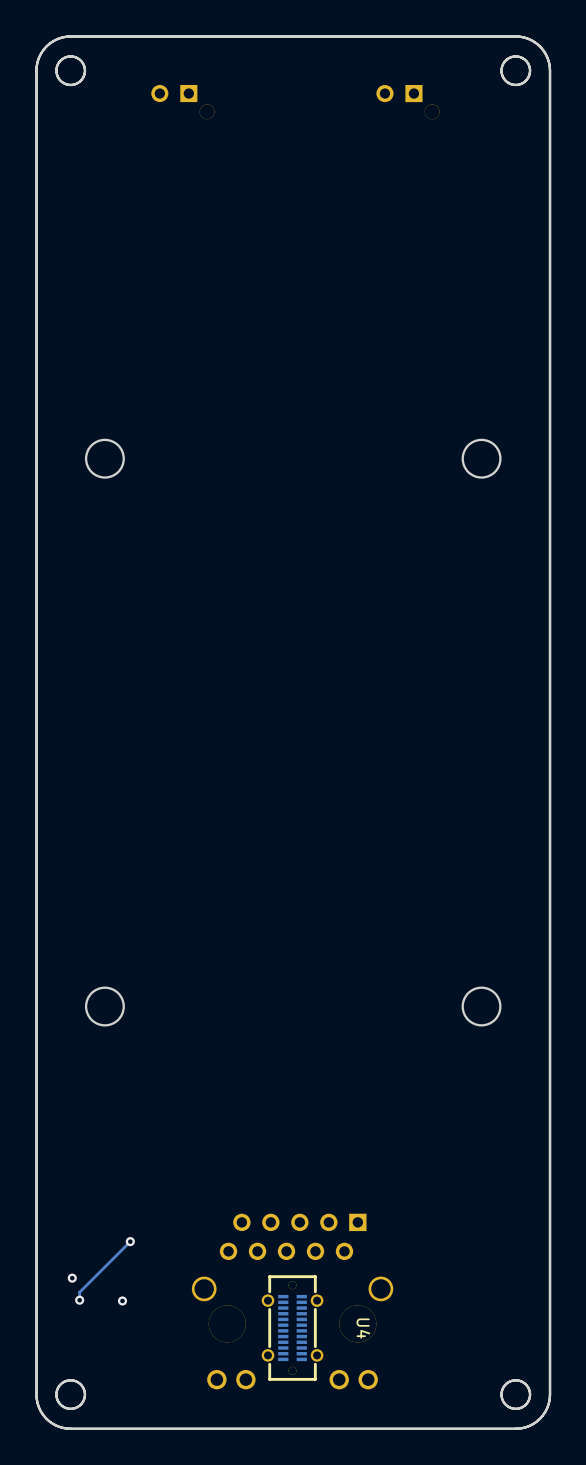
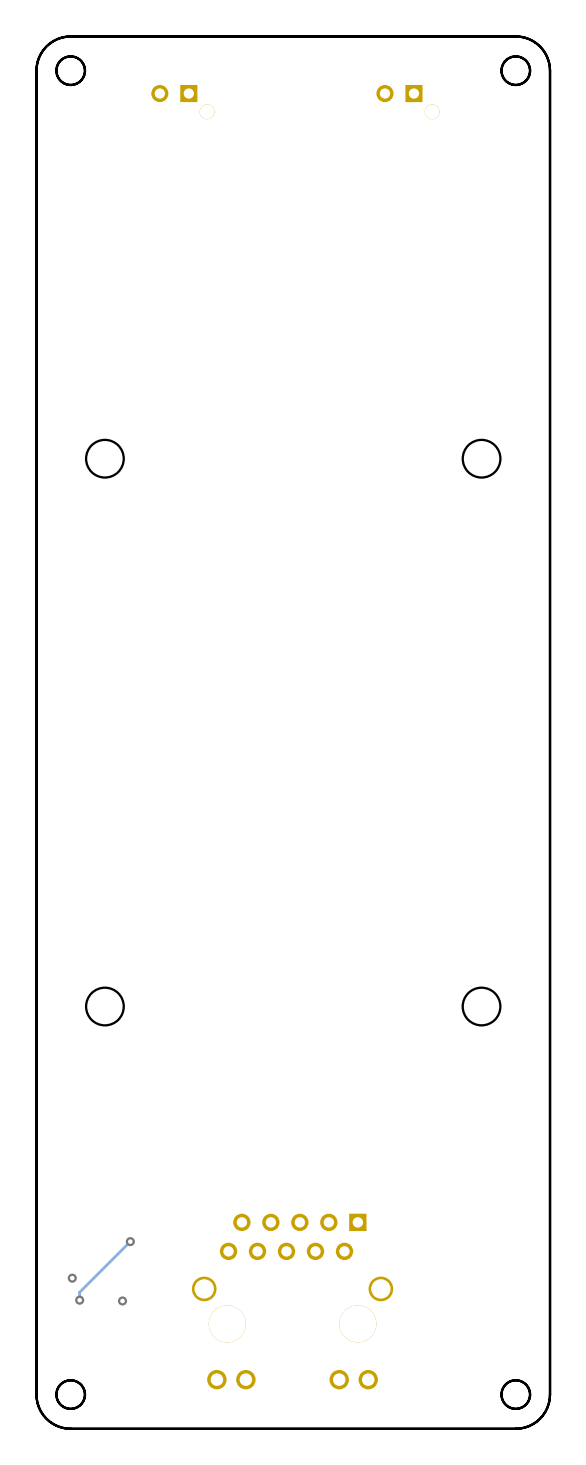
U4: (292, 1328) -> none

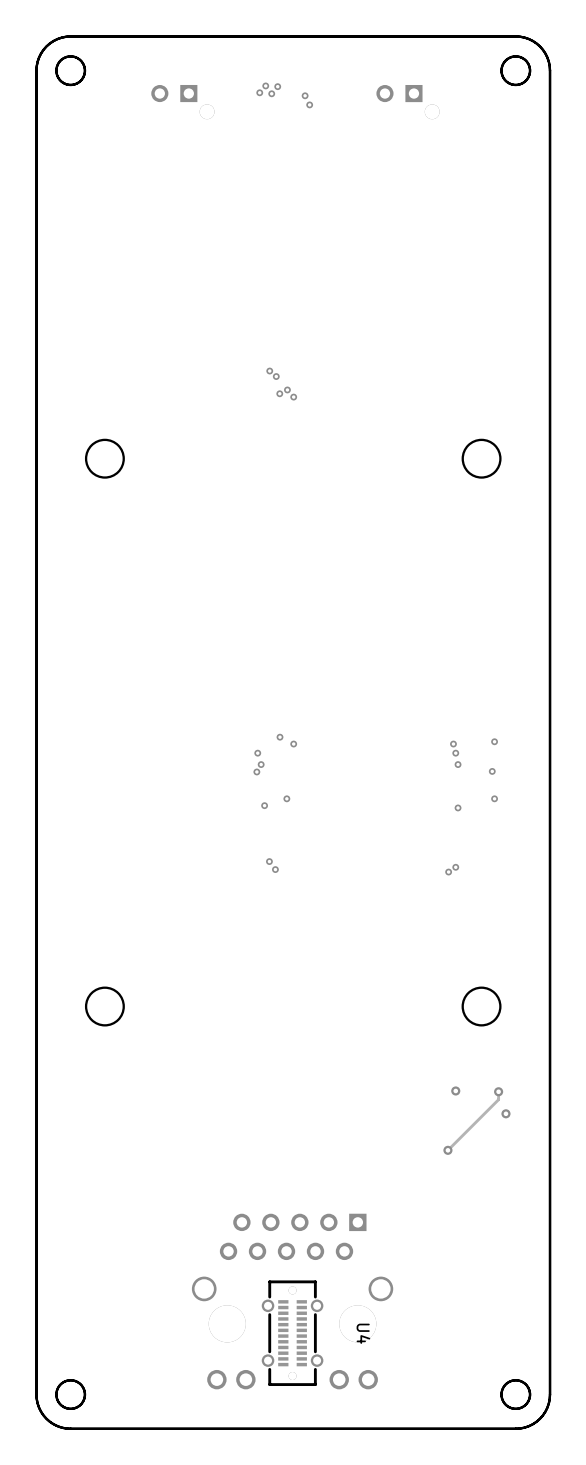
via: none -> (265, 85)
via: none -> (277, 86)
via: none -> (259, 92)
via: none -> (271, 93)
via: none -> (305, 95)
via: none -> (309, 104)
via: none -> (269, 371)
via: none -> (276, 376)
via: none -> (287, 389)
via: none -> (279, 393)
via: none -> (293, 397)
via: none -> (280, 737)
via: none -> (494, 741)
via: none -> (293, 744)
via: none -> (453, 744)
via: none -> (257, 753)
via: none -> (455, 753)
via: none -> (261, 764)
via: none -> (458, 764)
via: none -> (256, 771)
via: none -> (492, 771)
via: none -> (286, 798)
via: none -> (494, 798)
via: none -> (264, 805)
via: none -> (458, 807)
via: none -> (269, 861)
via: none -> (455, 867)
via: none -> (275, 869)
via: none -> (448, 872)
via: none -> (455, 1090)
track: none -> (498, 1091) (498, 1099) (447, 1150)
via: none -> (498, 1091)
via: none -> (505, 1113)
via: none -> (447, 1150)
track: (130, 1241) (79, 1292) (79, 1300) -> none
via: (130, 1241) -> none
via: (72, 1278) -> none
via: (79, 1300) -> none
via: (122, 1300) -> none
U4: none -> (292, 1333)

